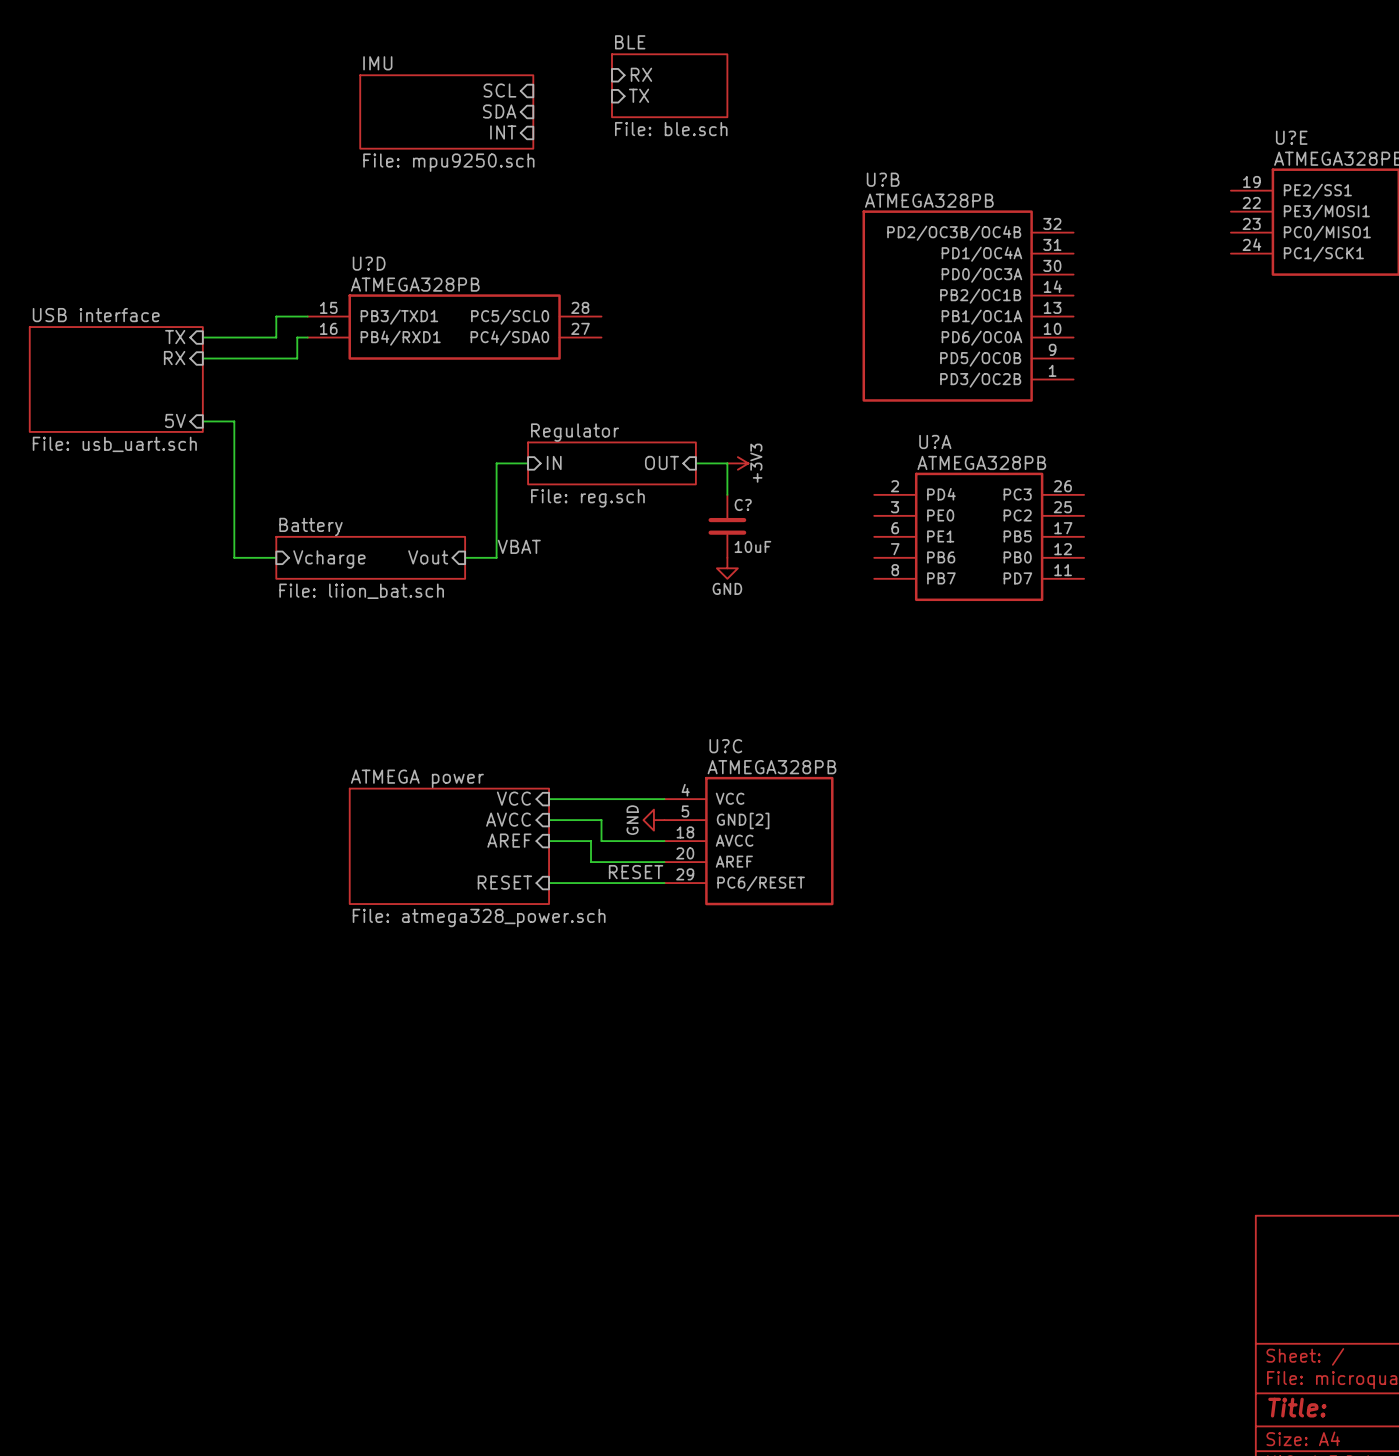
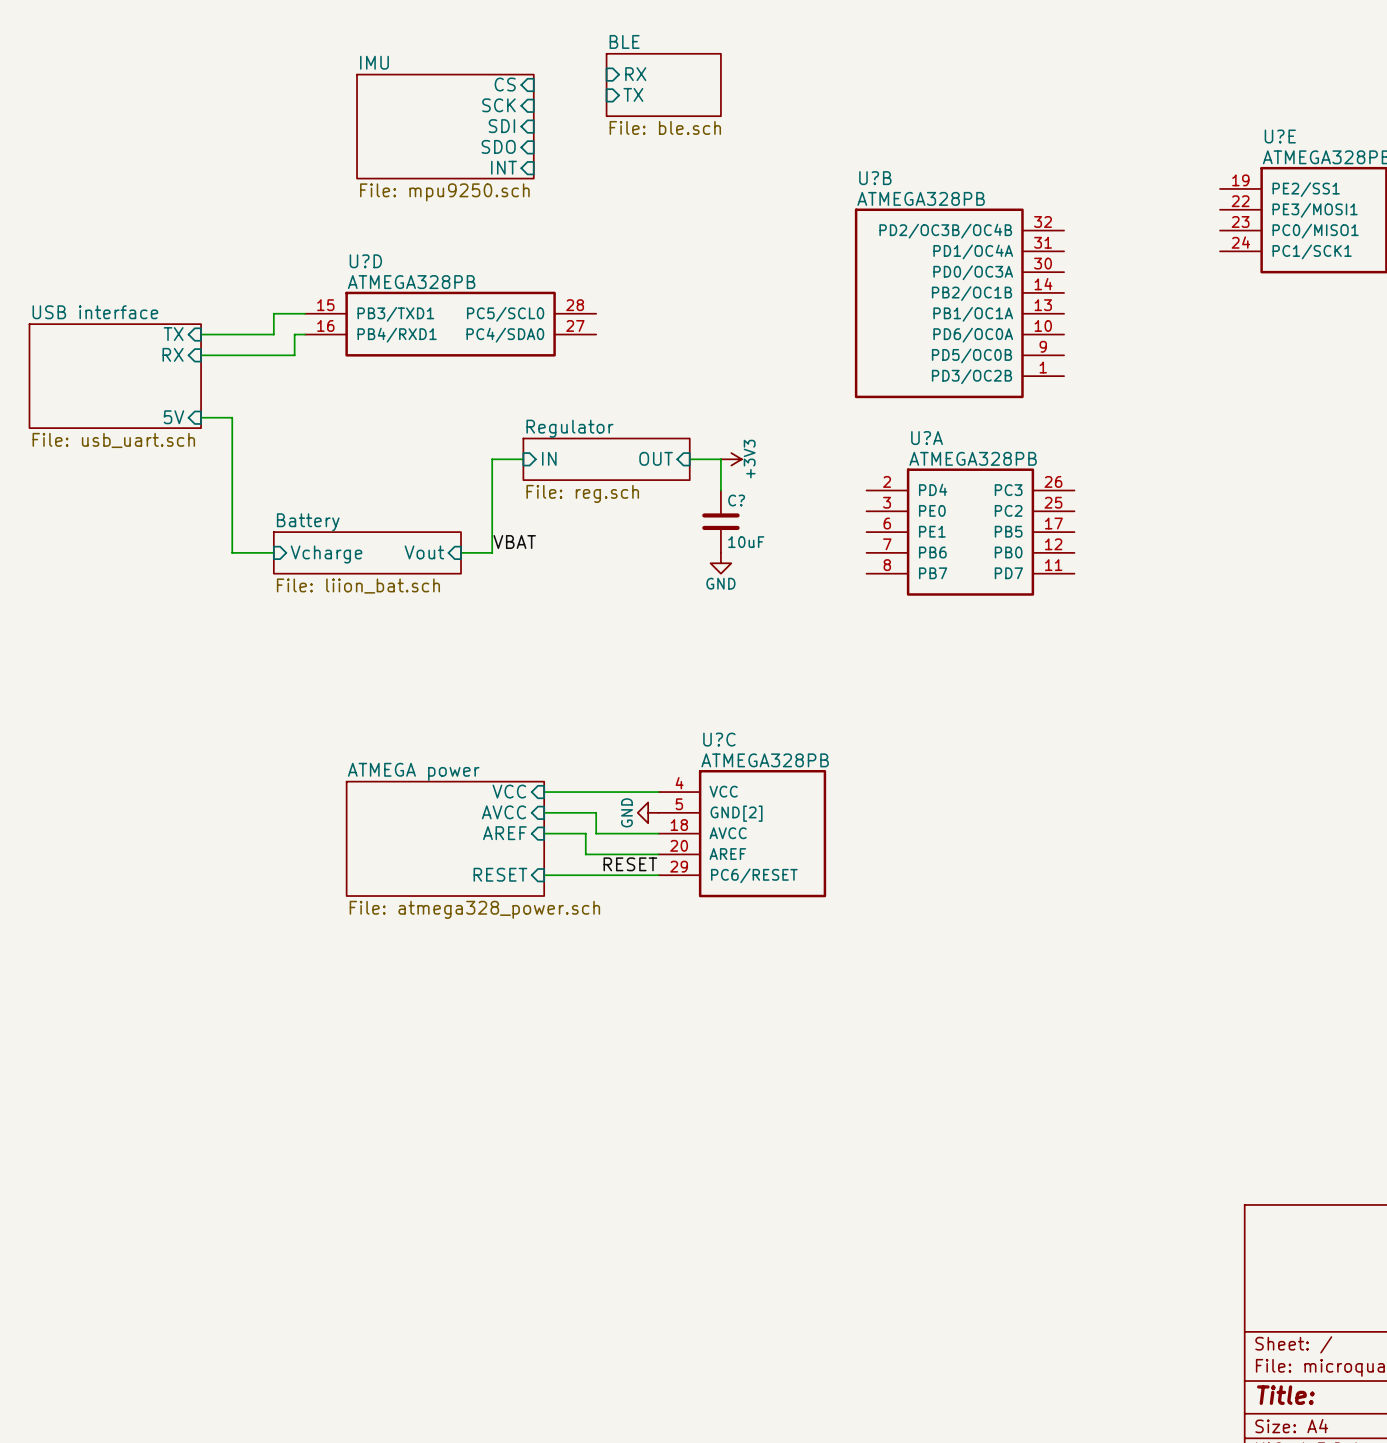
sheet pin: SCL (499, 90) -> CS (505, 84)
sheet IMU: File: mpu9250.sch (446, 111) -> none
sheet pin: SDA (499, 111) -> SCK (498, 105)
sheet IMU: none -> File: mpu9250.sch (445, 126)
sheet pin: none -> SDI (501, 126)
sheet pin position: INT (503, 132) -> INT (504, 167)
sheet pin: none -> SDO (498, 146)

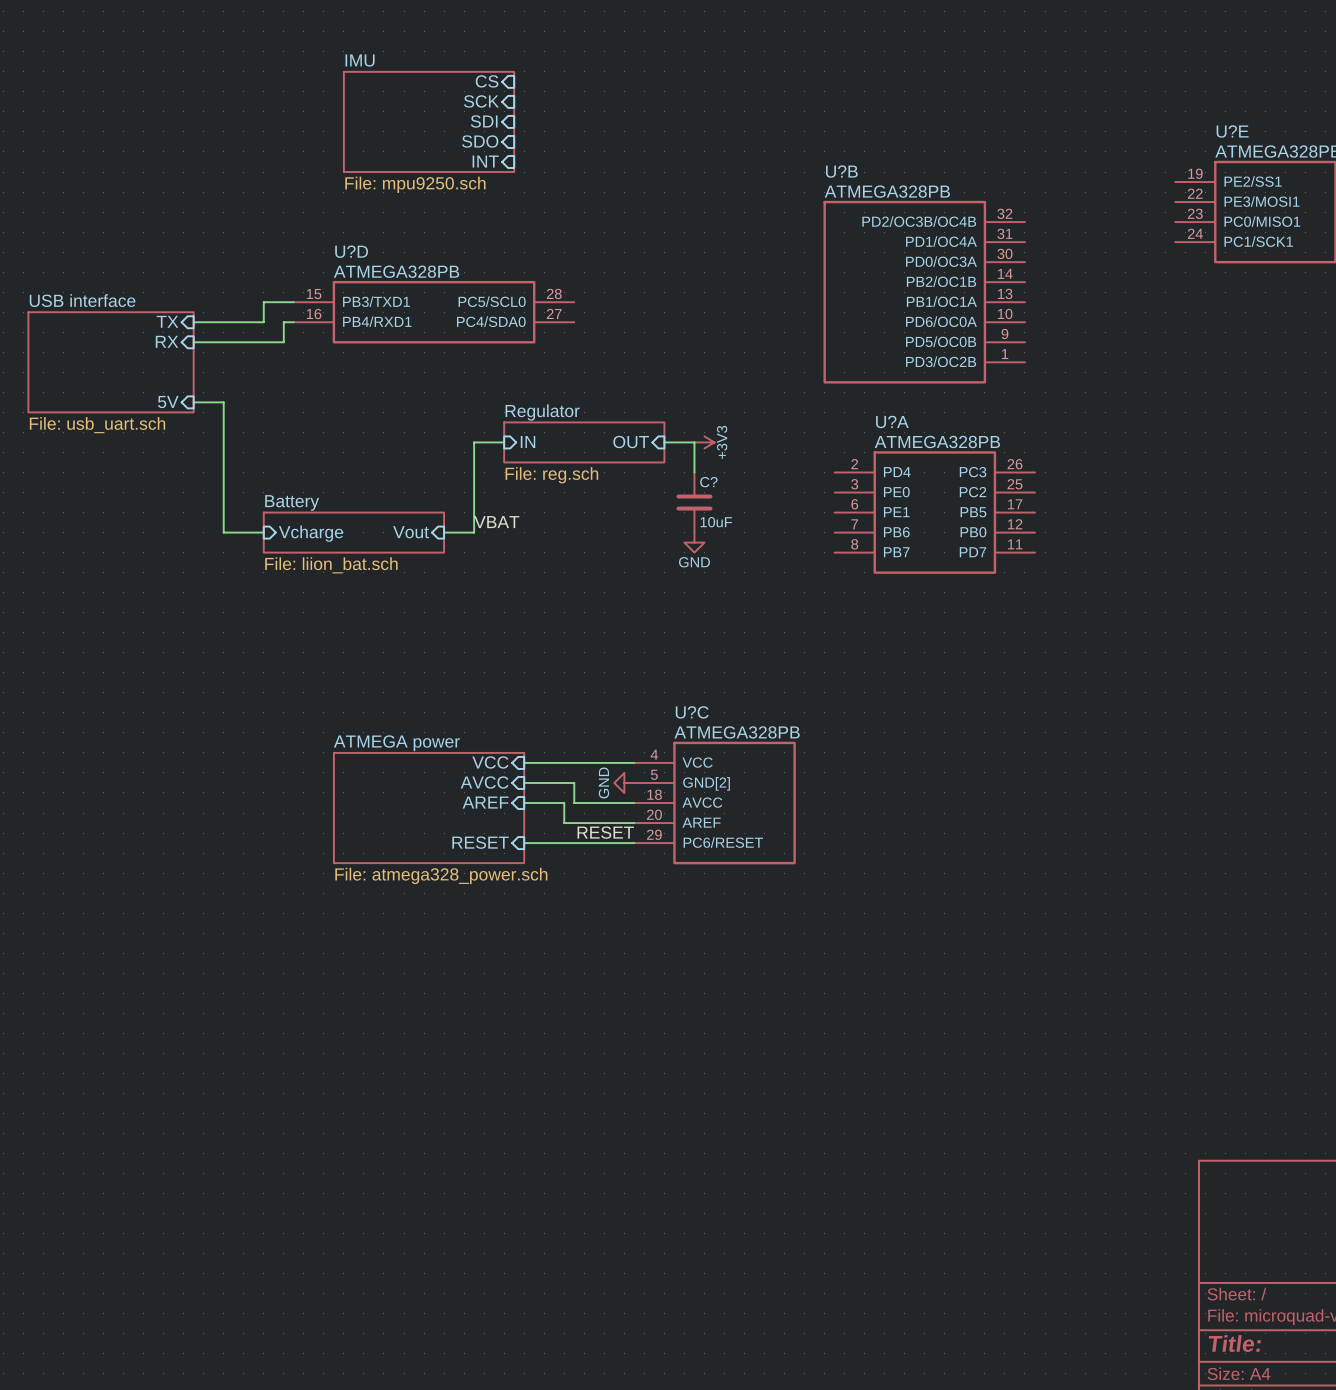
sheet pin: RX (635, 74) -> none
sheet BLE: File: ble.sch (663, 84) -> none
sheet pin: TX (633, 94) -> none

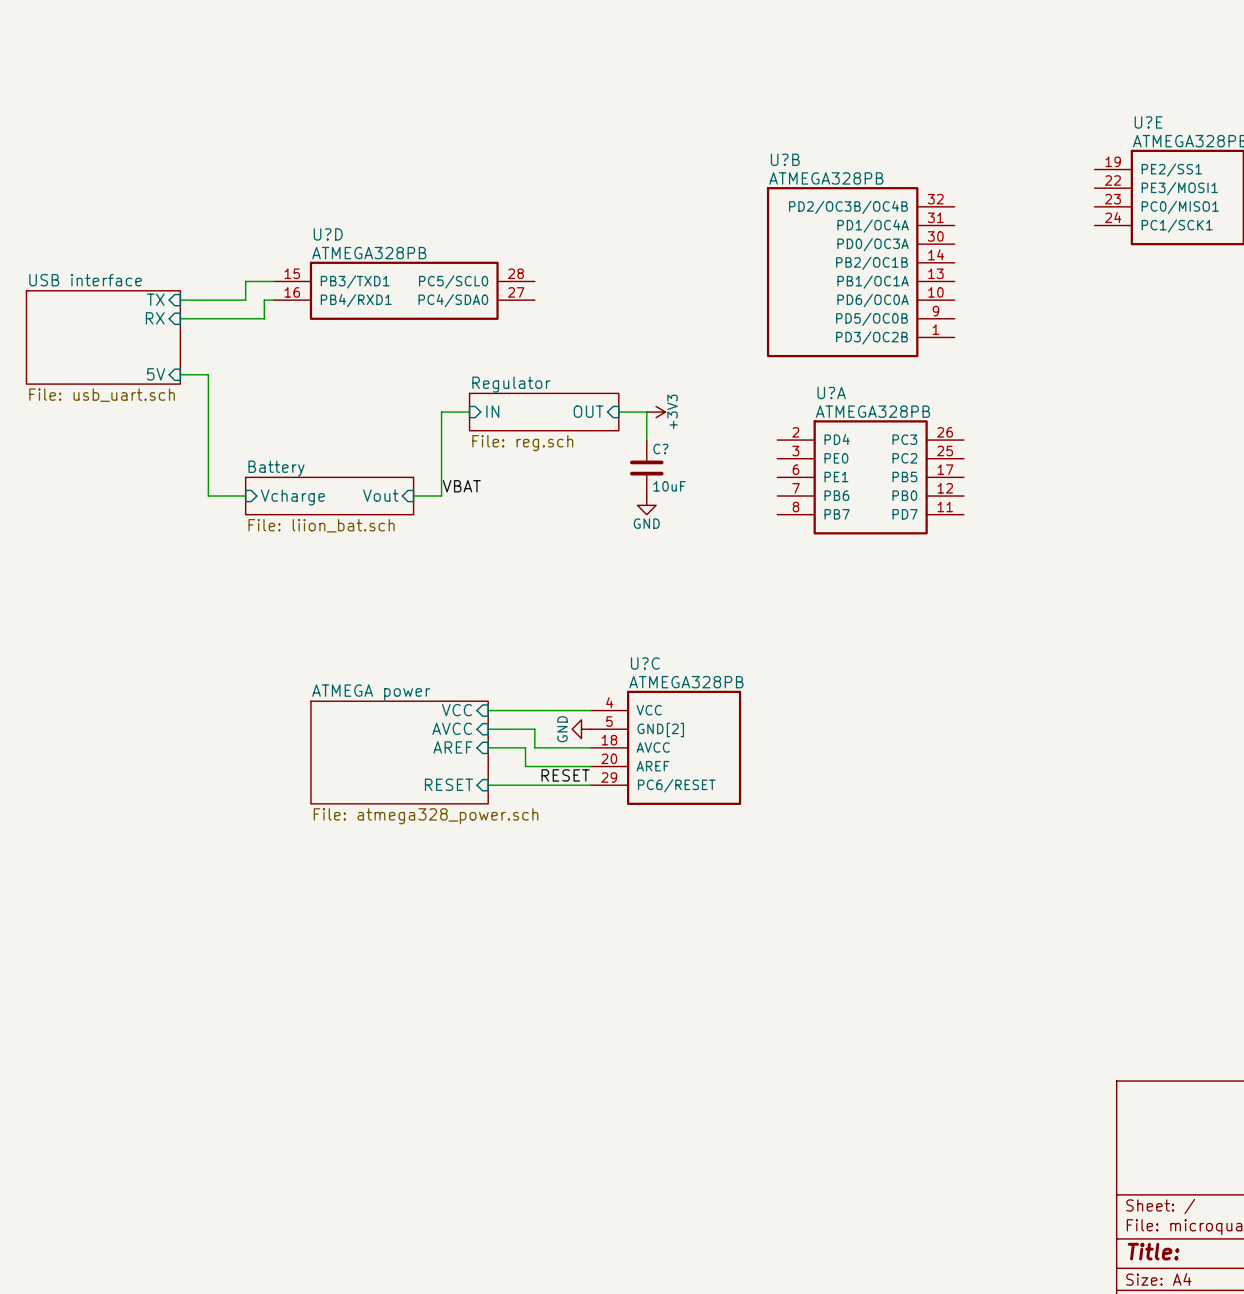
sheet pin: CS (487, 81) -> none
sheet pin: SCK (481, 101) -> none
sheet IMU: File: mpu9250.sch (429, 121) -> none
sheet pin: SDI (484, 121) -> none
sheet pin: SDO (480, 141) -> none
sheet pin: INT (485, 161) -> none

